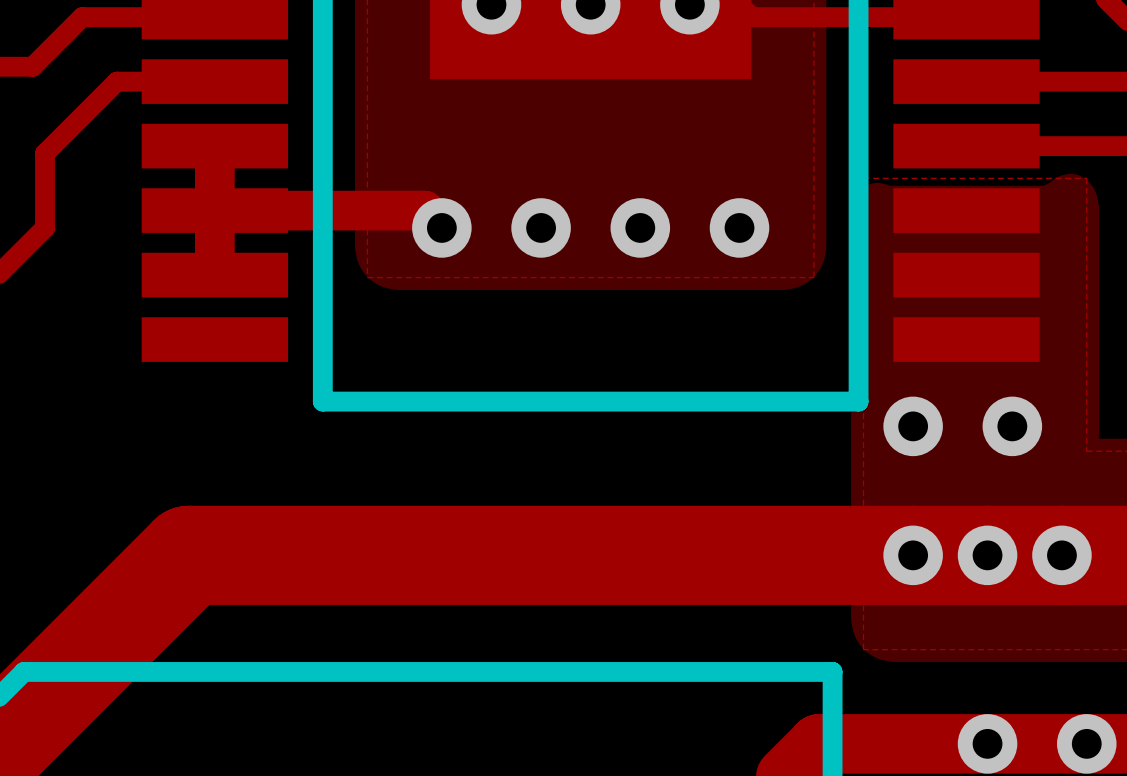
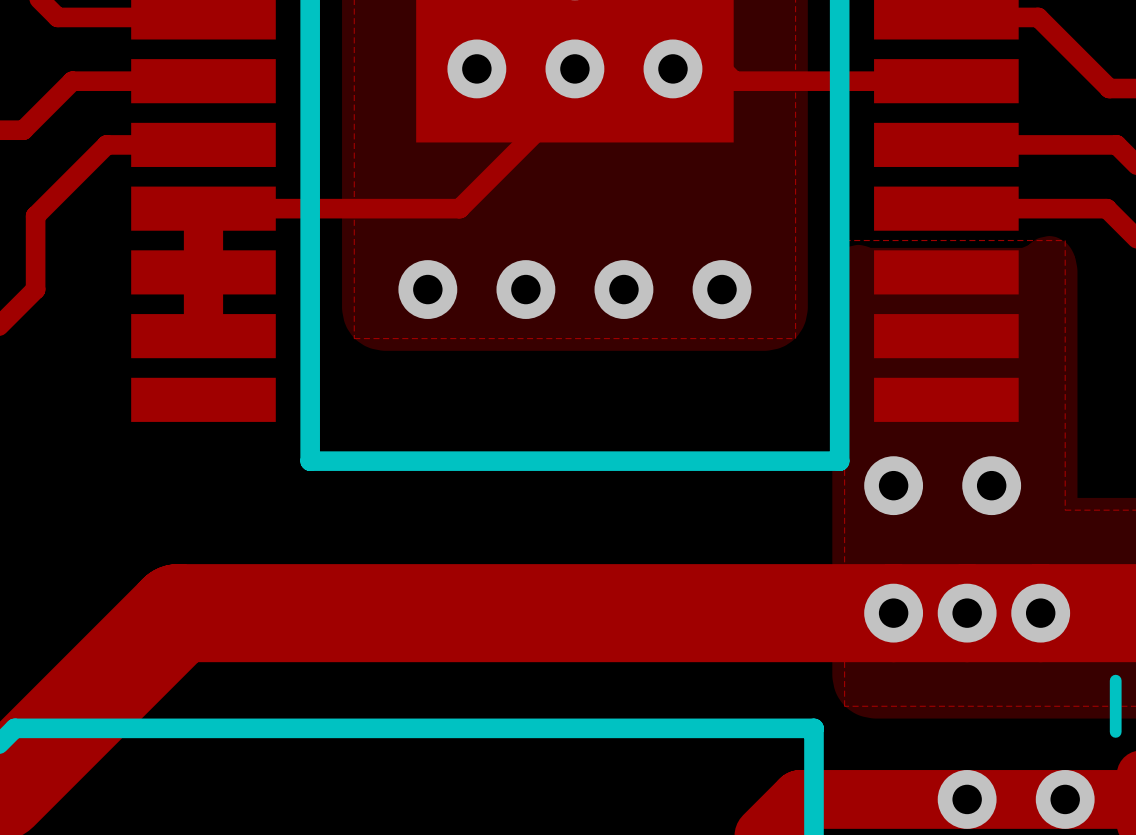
track: none -> (574, 93) (459, 208) (203, 208)
track: (214, 210) (424, 210) (441, 227) -> none

